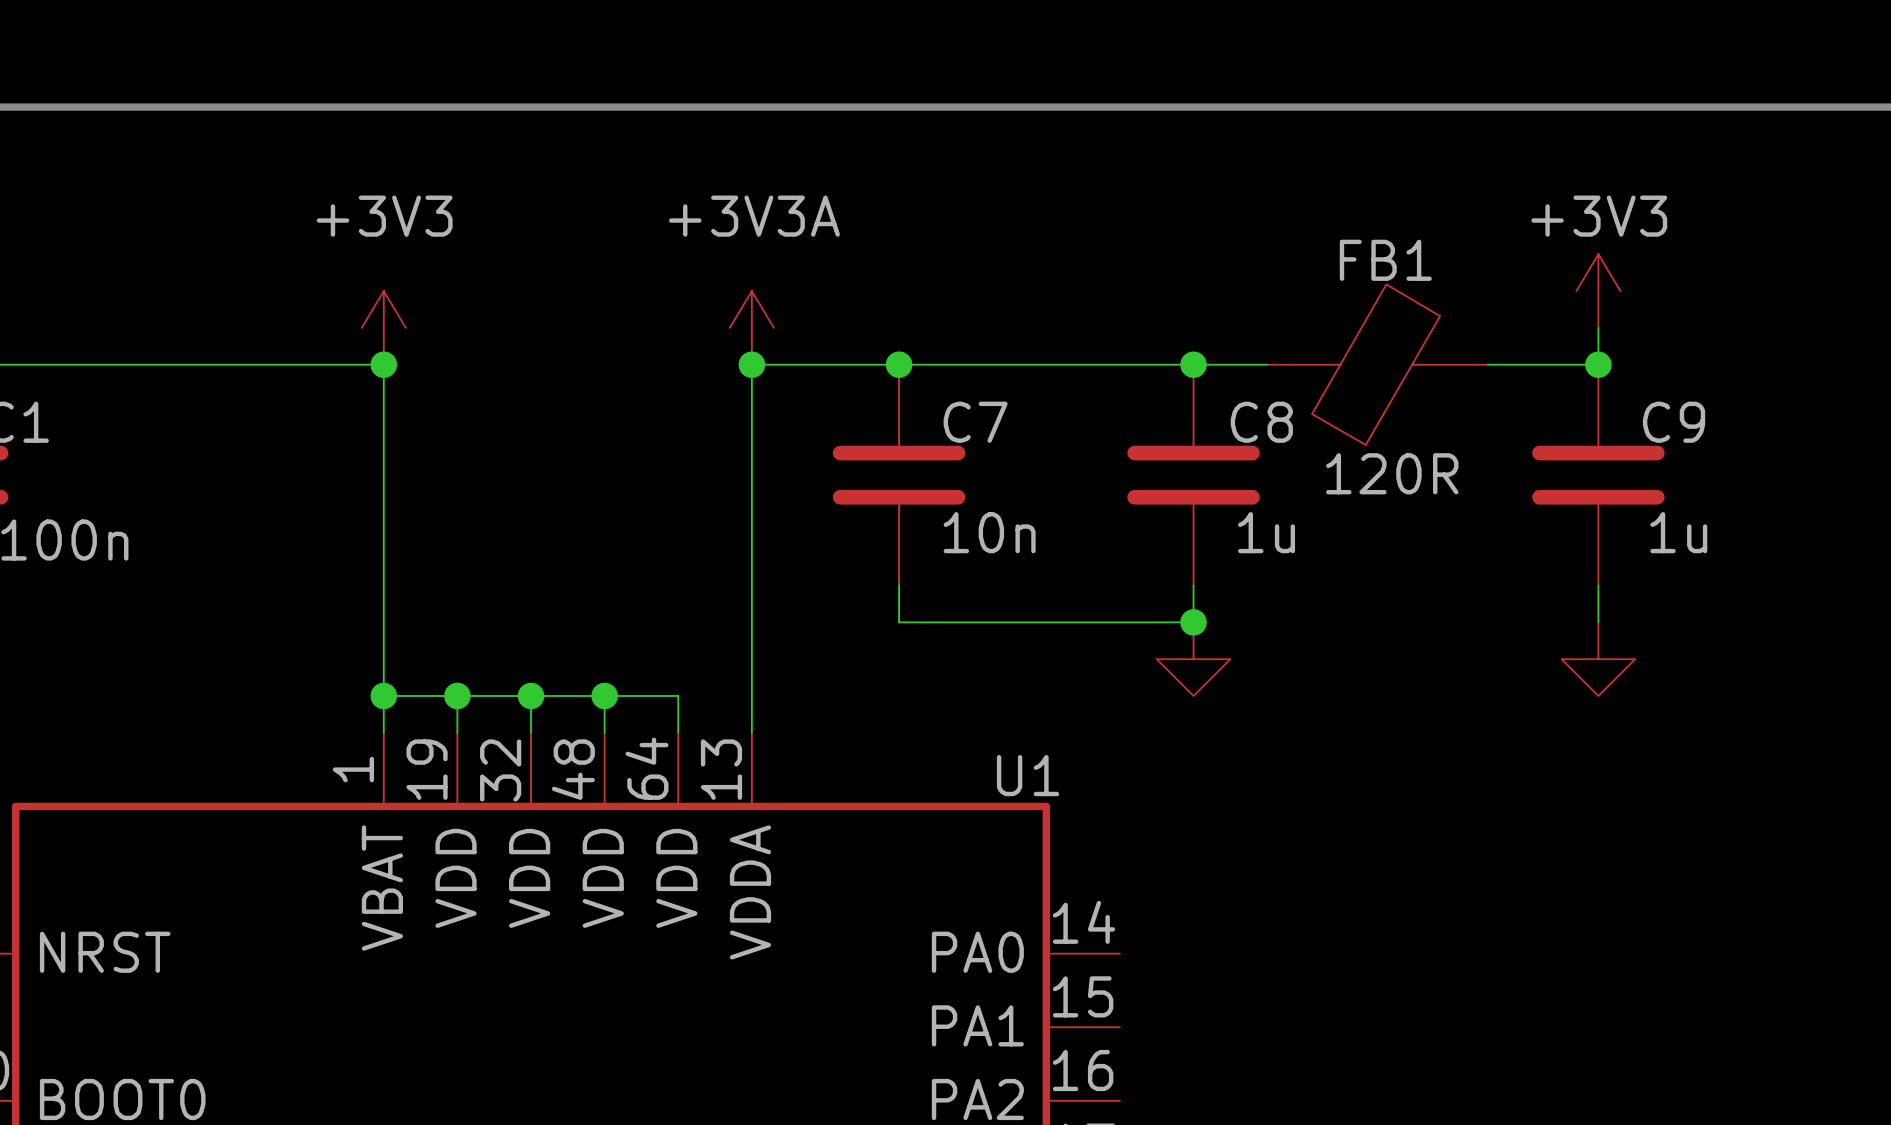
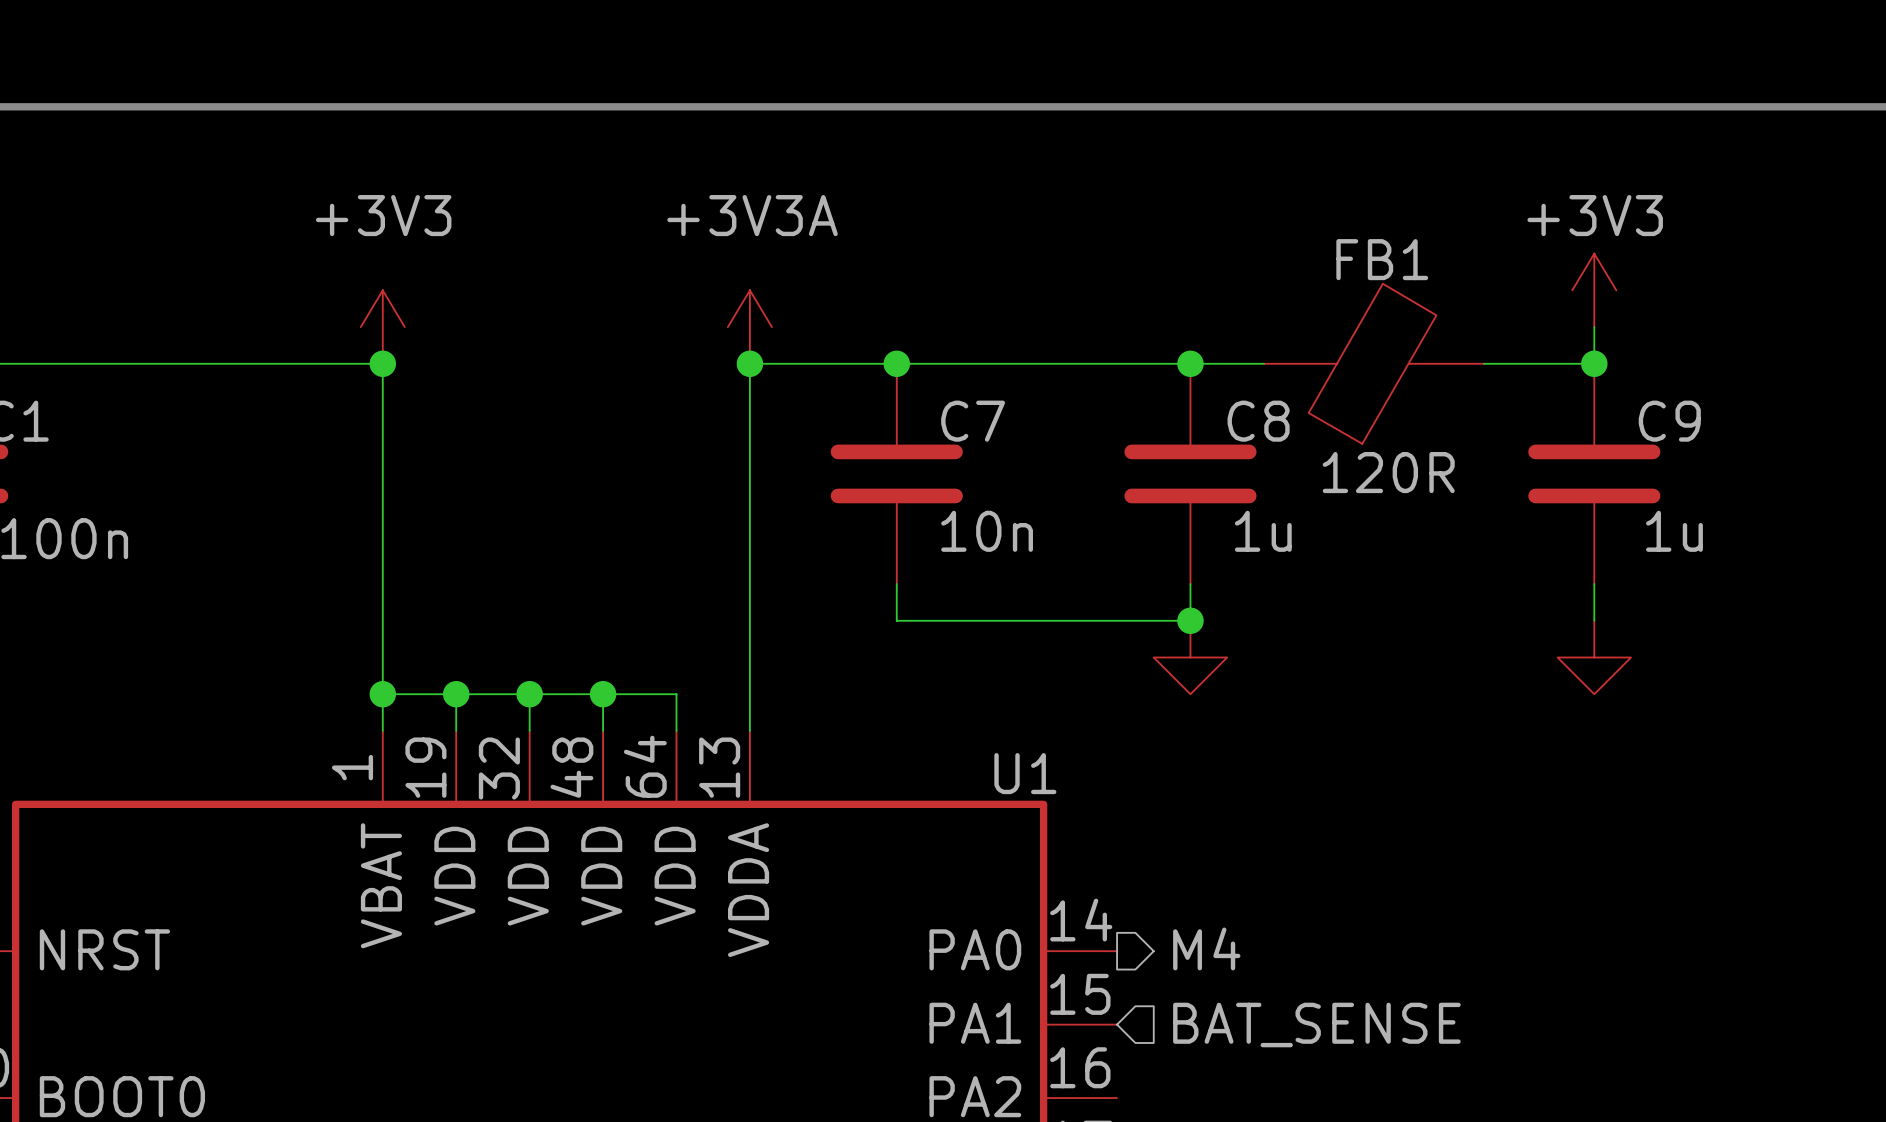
hierarchical label: none -> M4 (1206, 948)
hierarchical label: none -> BAT_SENSE (1316, 1025)

